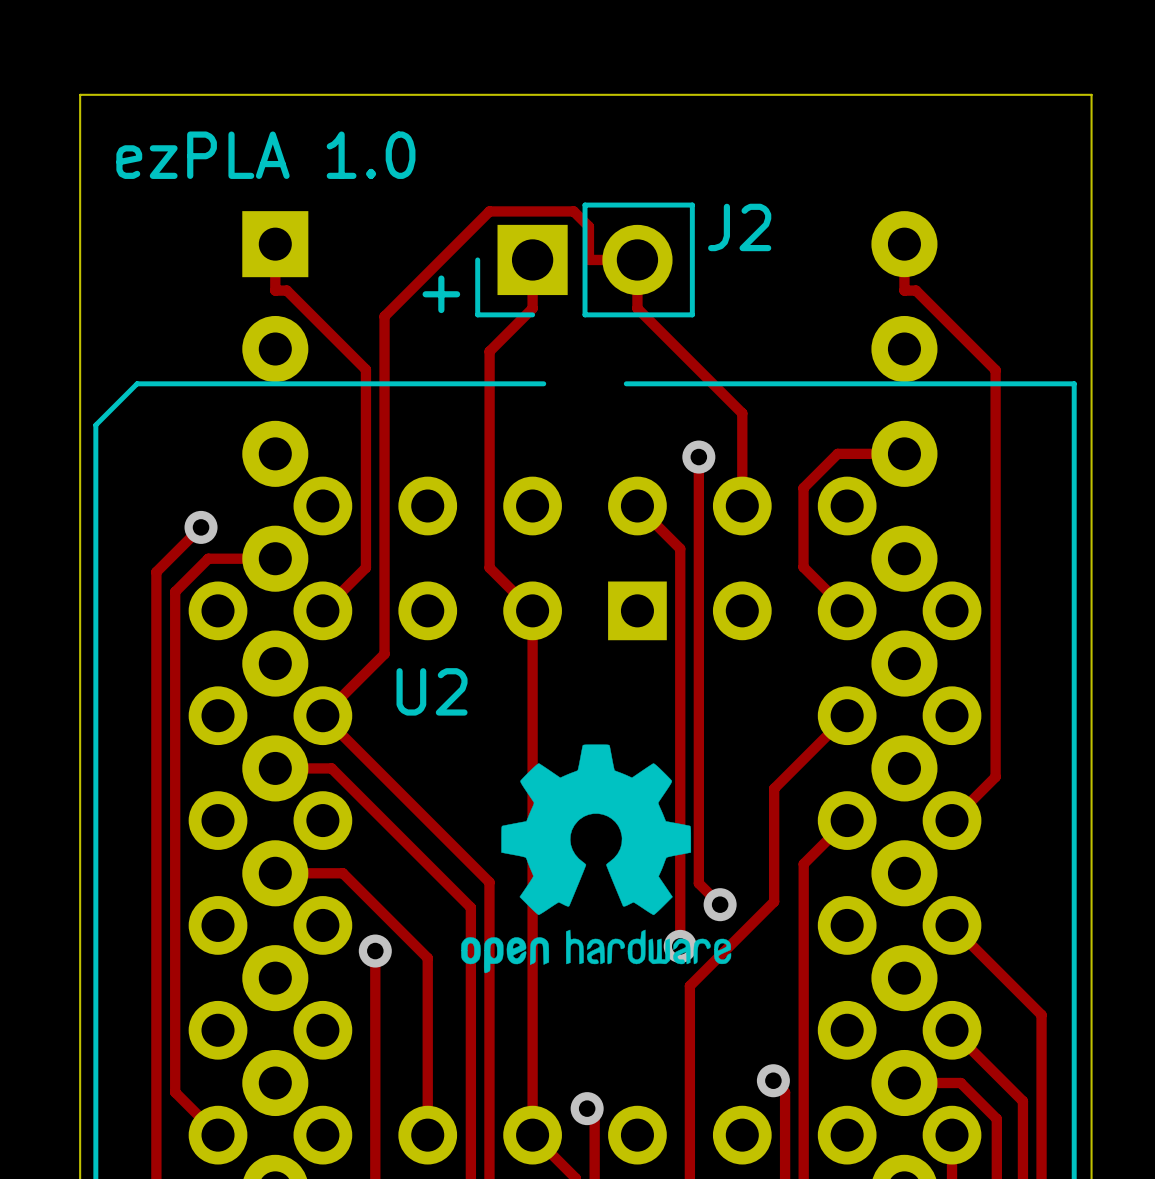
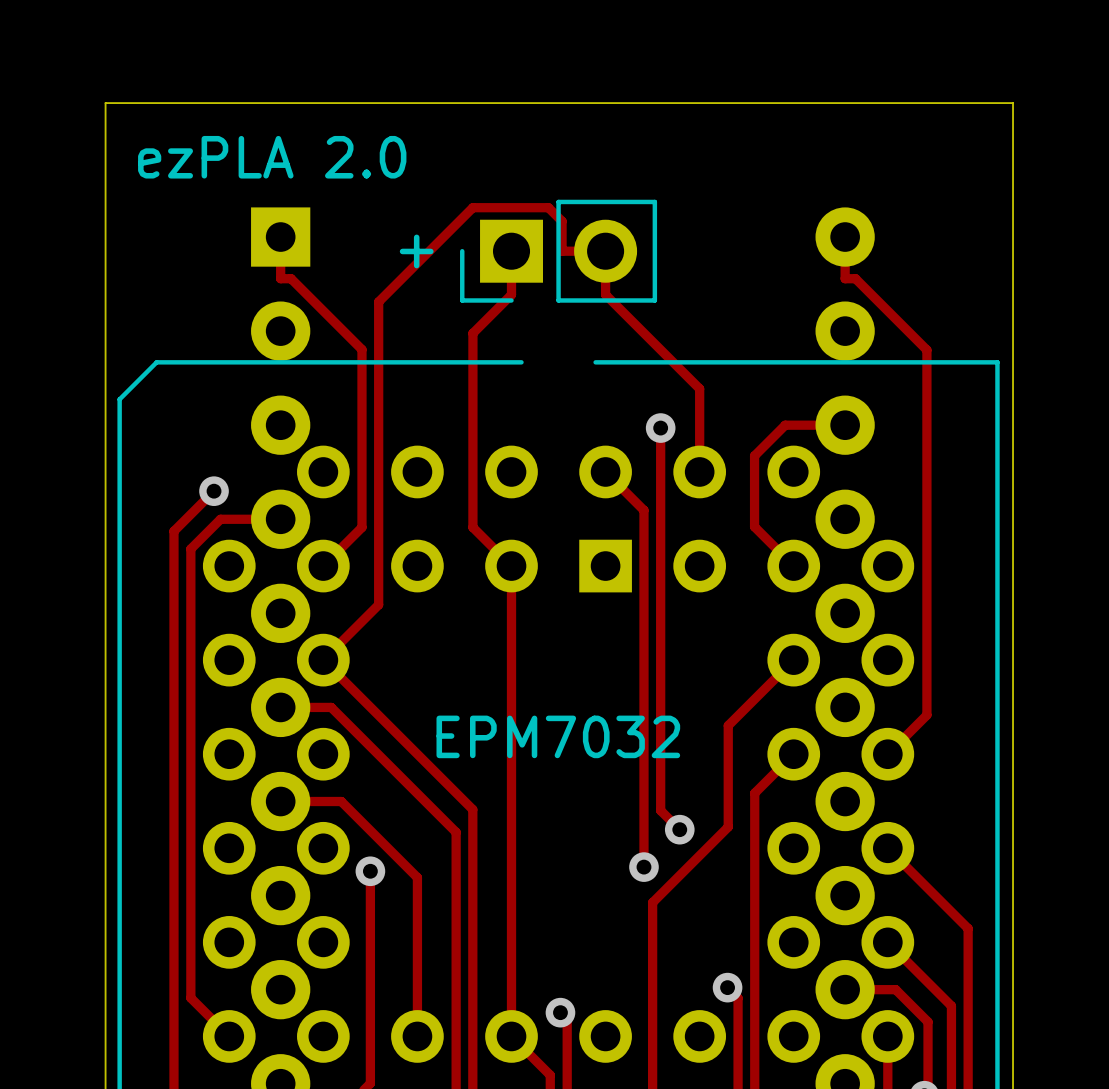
text: ezPLA 1.0 (265, 155) -> ezPLA 2.0 (272, 157)
J2 name: J2 (739, 227) -> none
text position: + (441, 294) -> + (416, 251)
U2 name: U2 (432, 691) -> none
drawing: [461, 744, 732, 974] -> none
text: none -> EPM7032 (558, 736)

